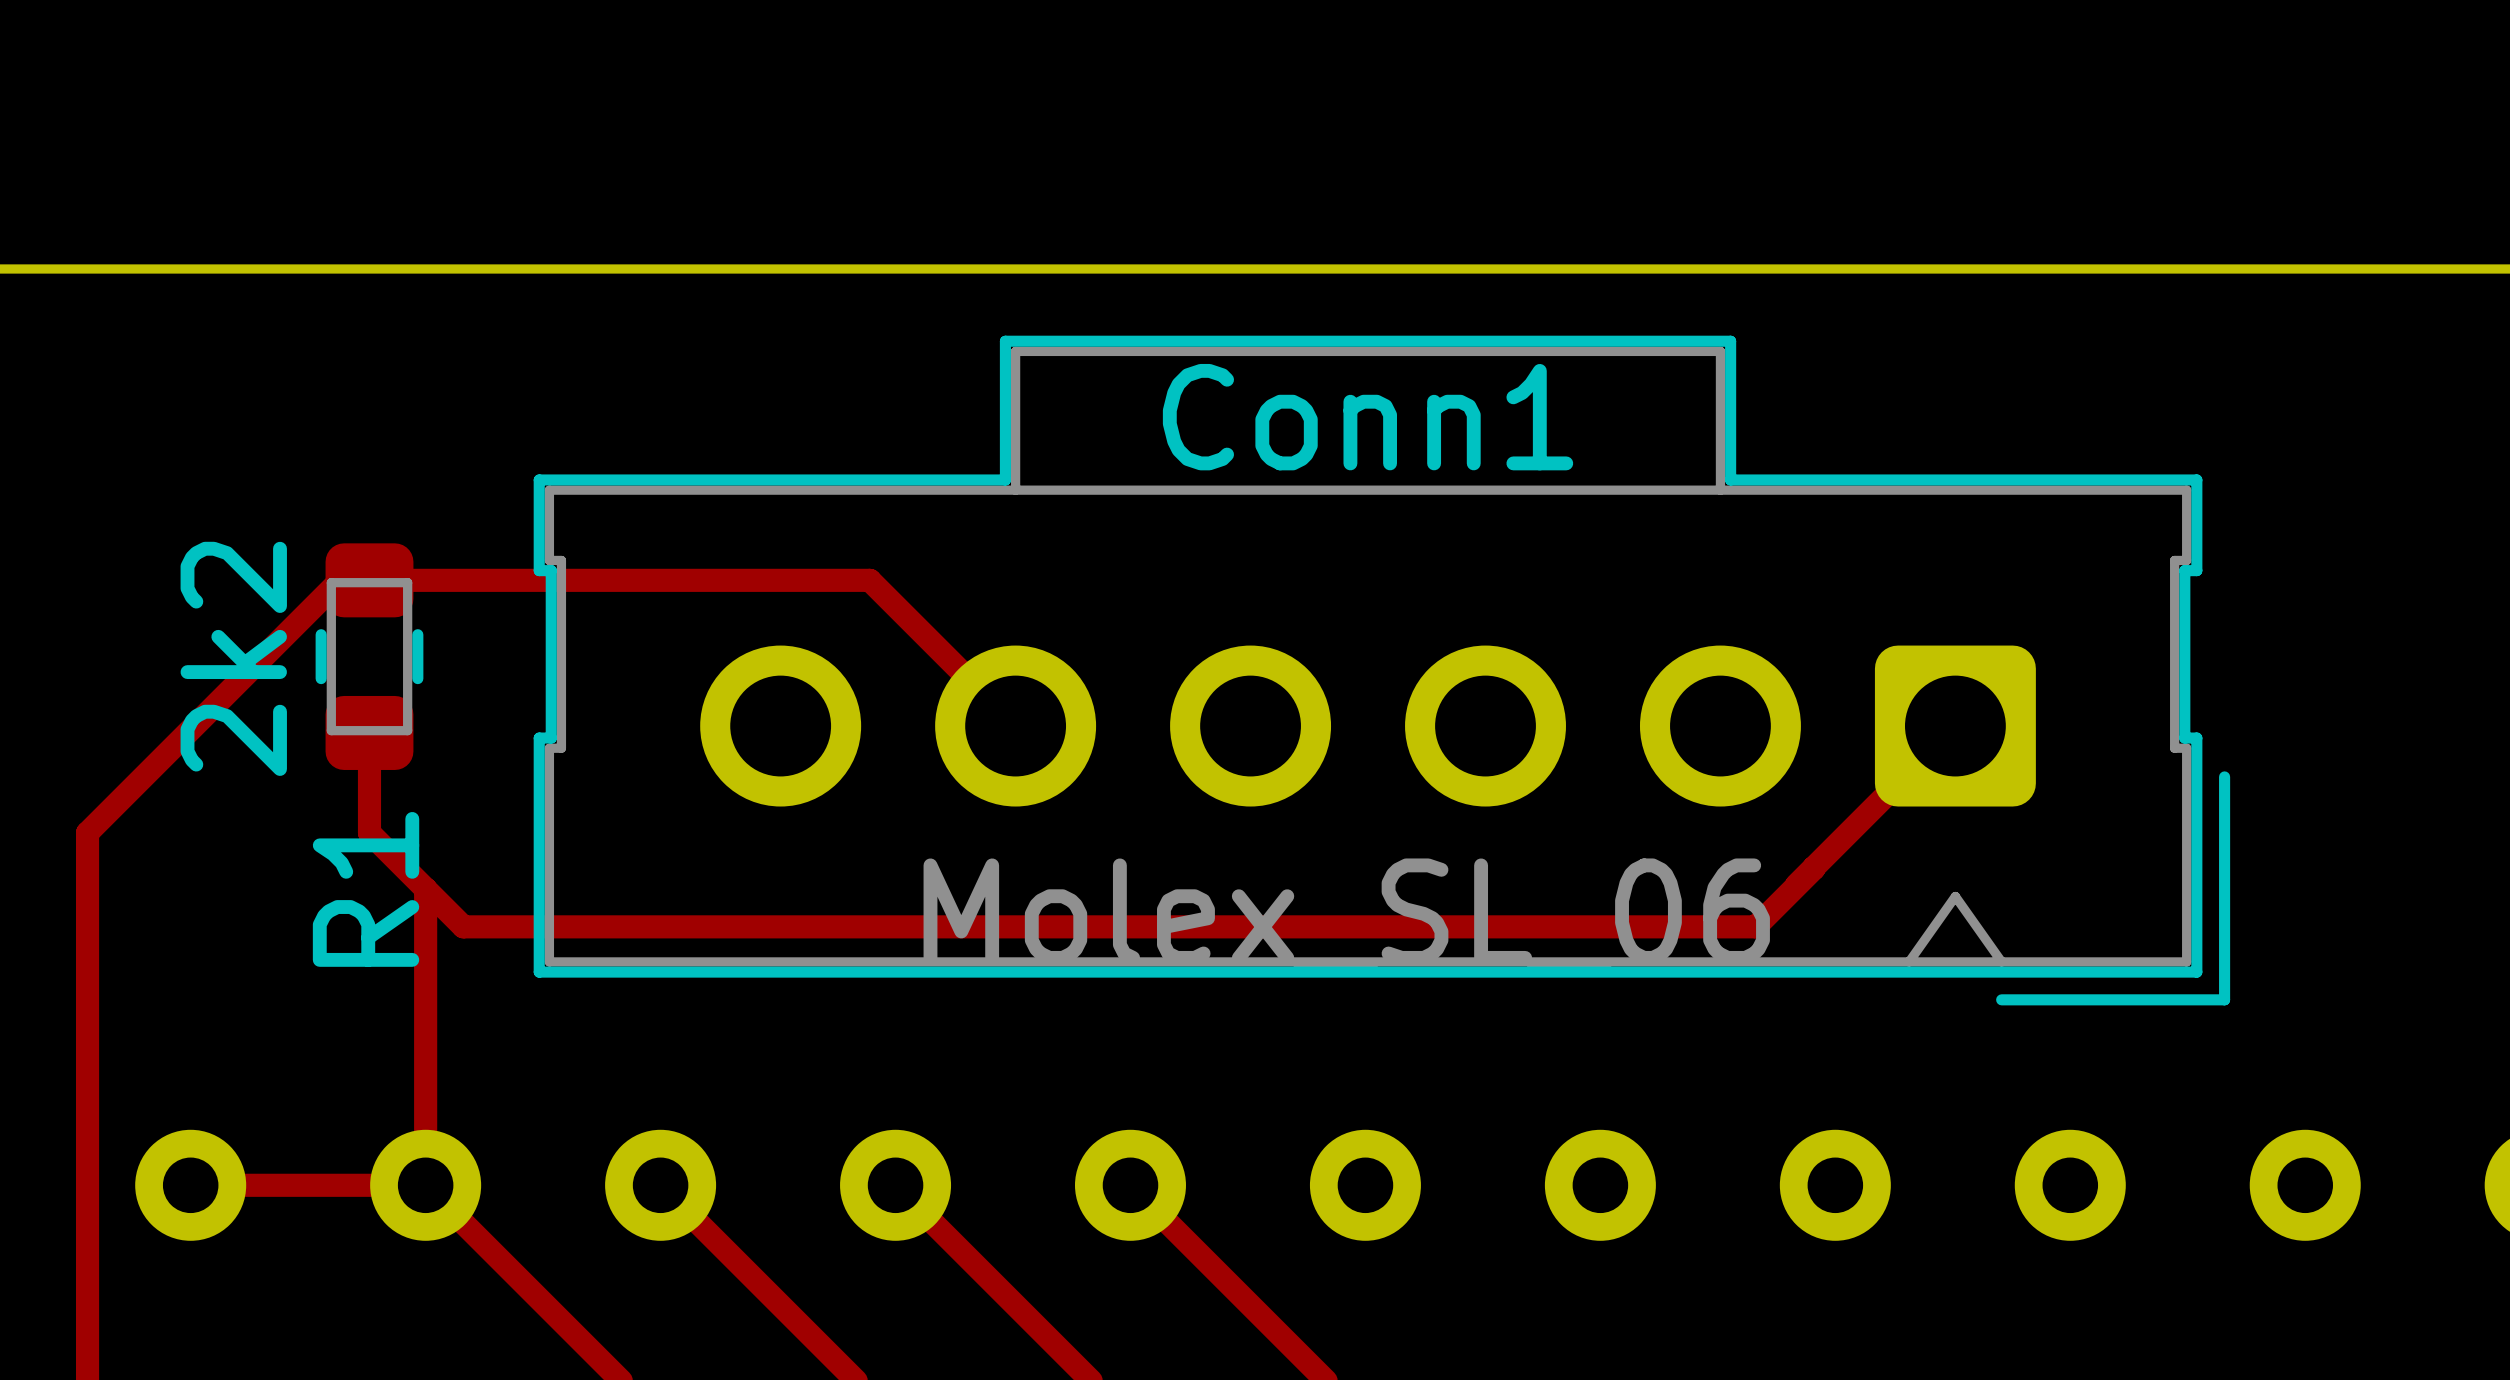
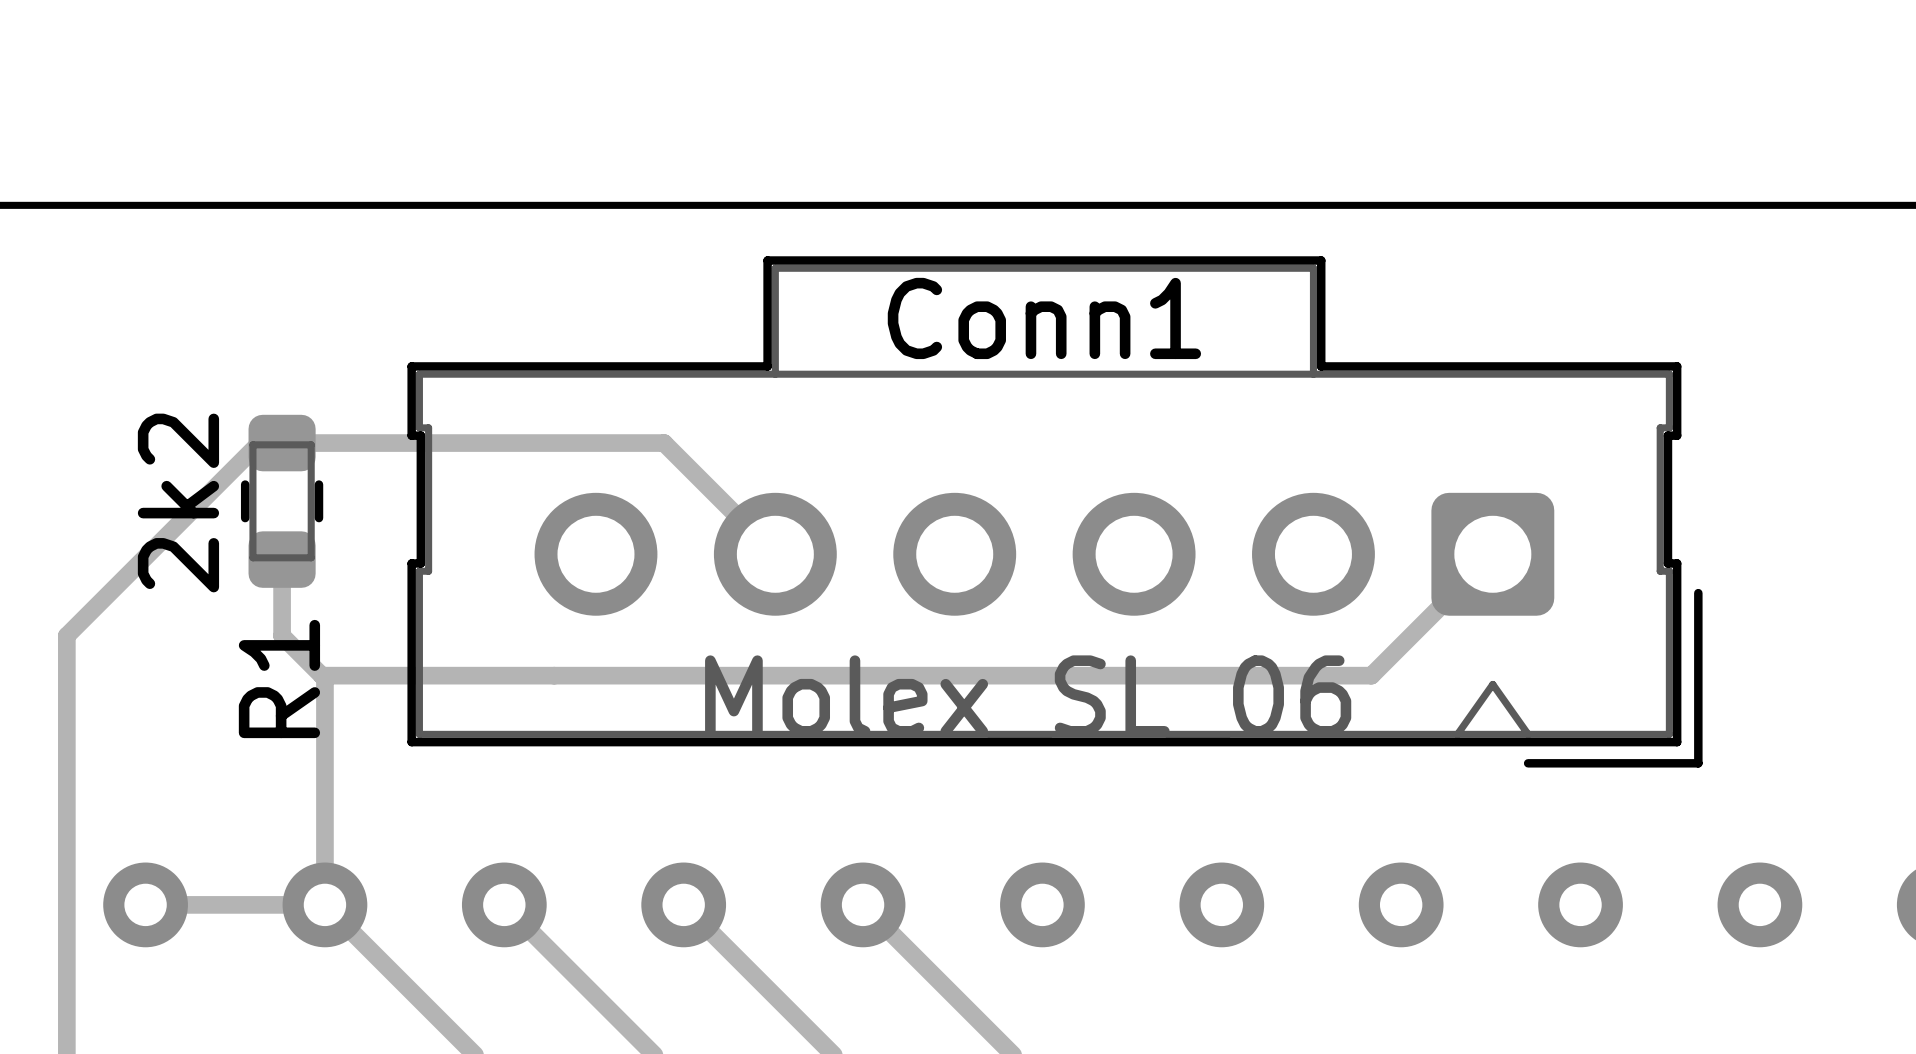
track: (1813, 868) (1755, 926) (463, 926) (421, 885) -> (1371, 675) (321, 675)

